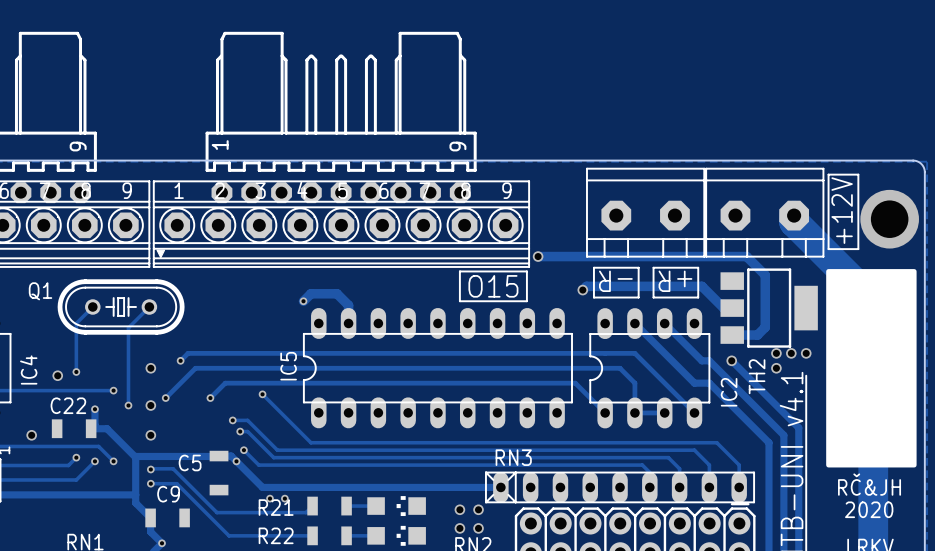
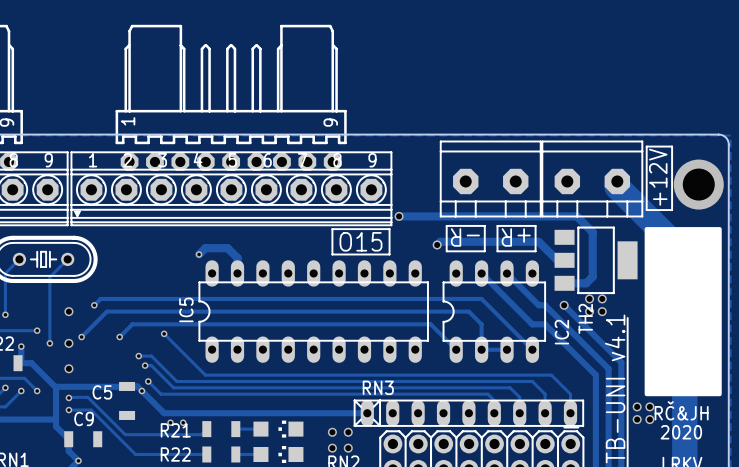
via: none -> (589, 298)
via: (791, 353) -> none
via: (806, 353) -> none
via: none -> (589, 311)
via: none -> (637, 406)
via: none -> (649, 406)
via: none -> (637, 419)
via: none -> (649, 419)

